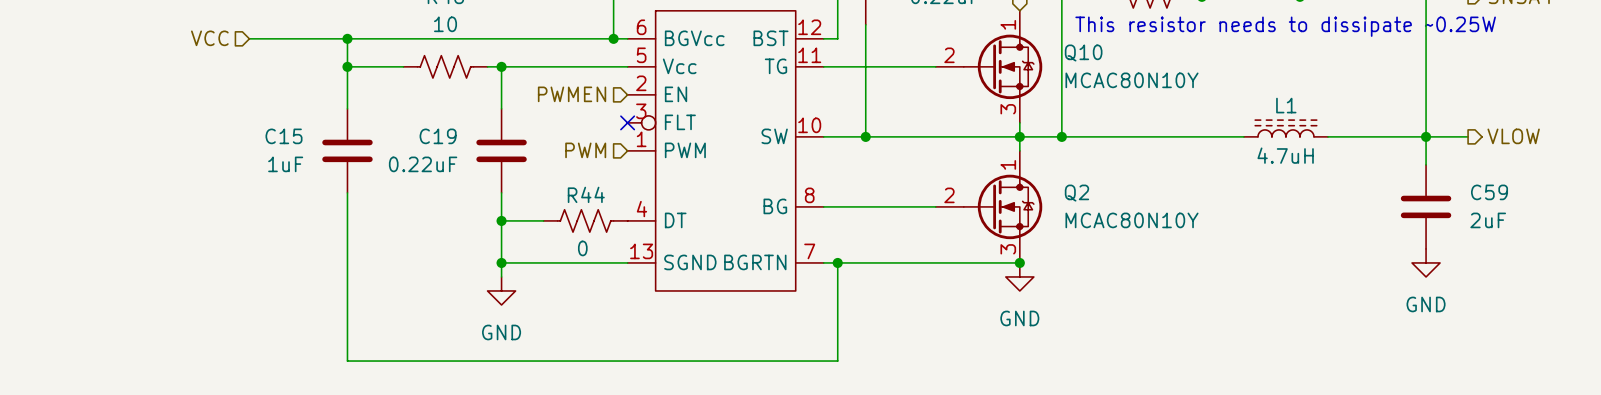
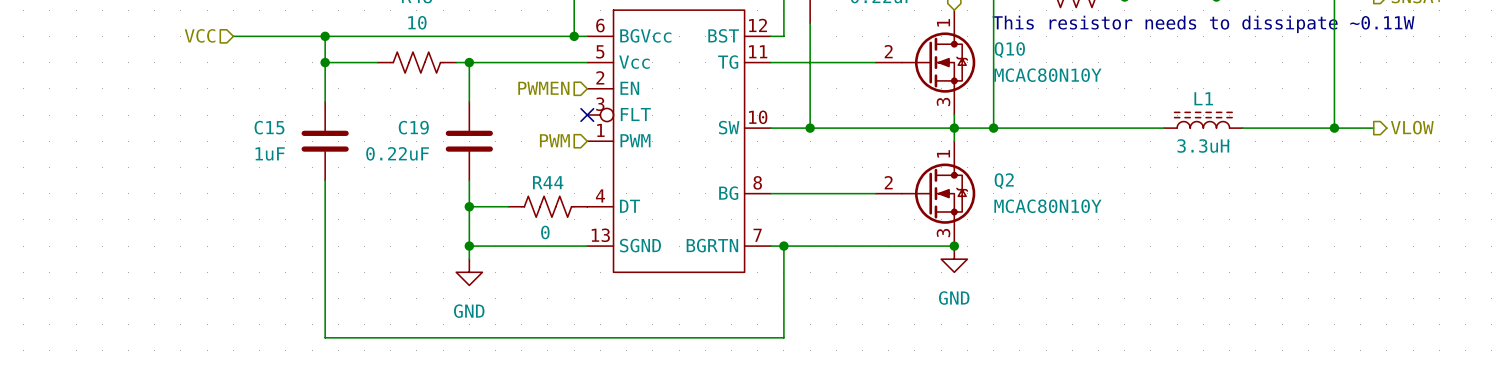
text: This resistor needs to dissipate ~0.25W (1285, 26) -> This resistor needs to dissipate ~0.11W (1203, 24)
wire: (1426, 136) (1426, 164) -> none
L1 value: 4.7uH (1285, 155) -> 3.3uH (1203, 145)
C59: 2uF (1426, 206) -> none
power symbol: GND (1426, 262) -> none

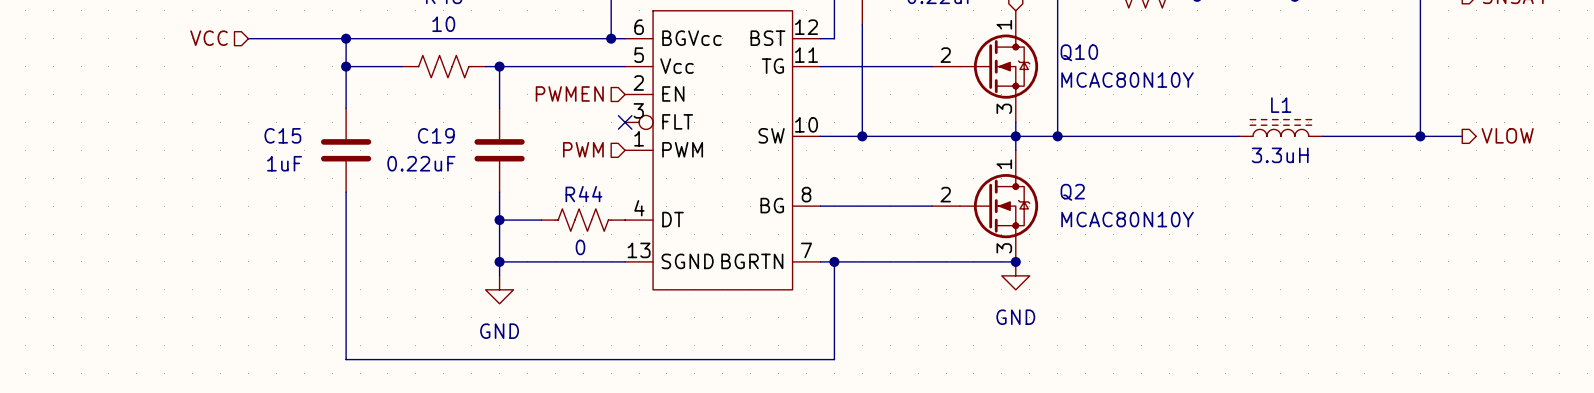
text: This resistor needs to dissipate ~0.11W (1203, 24) -> none

